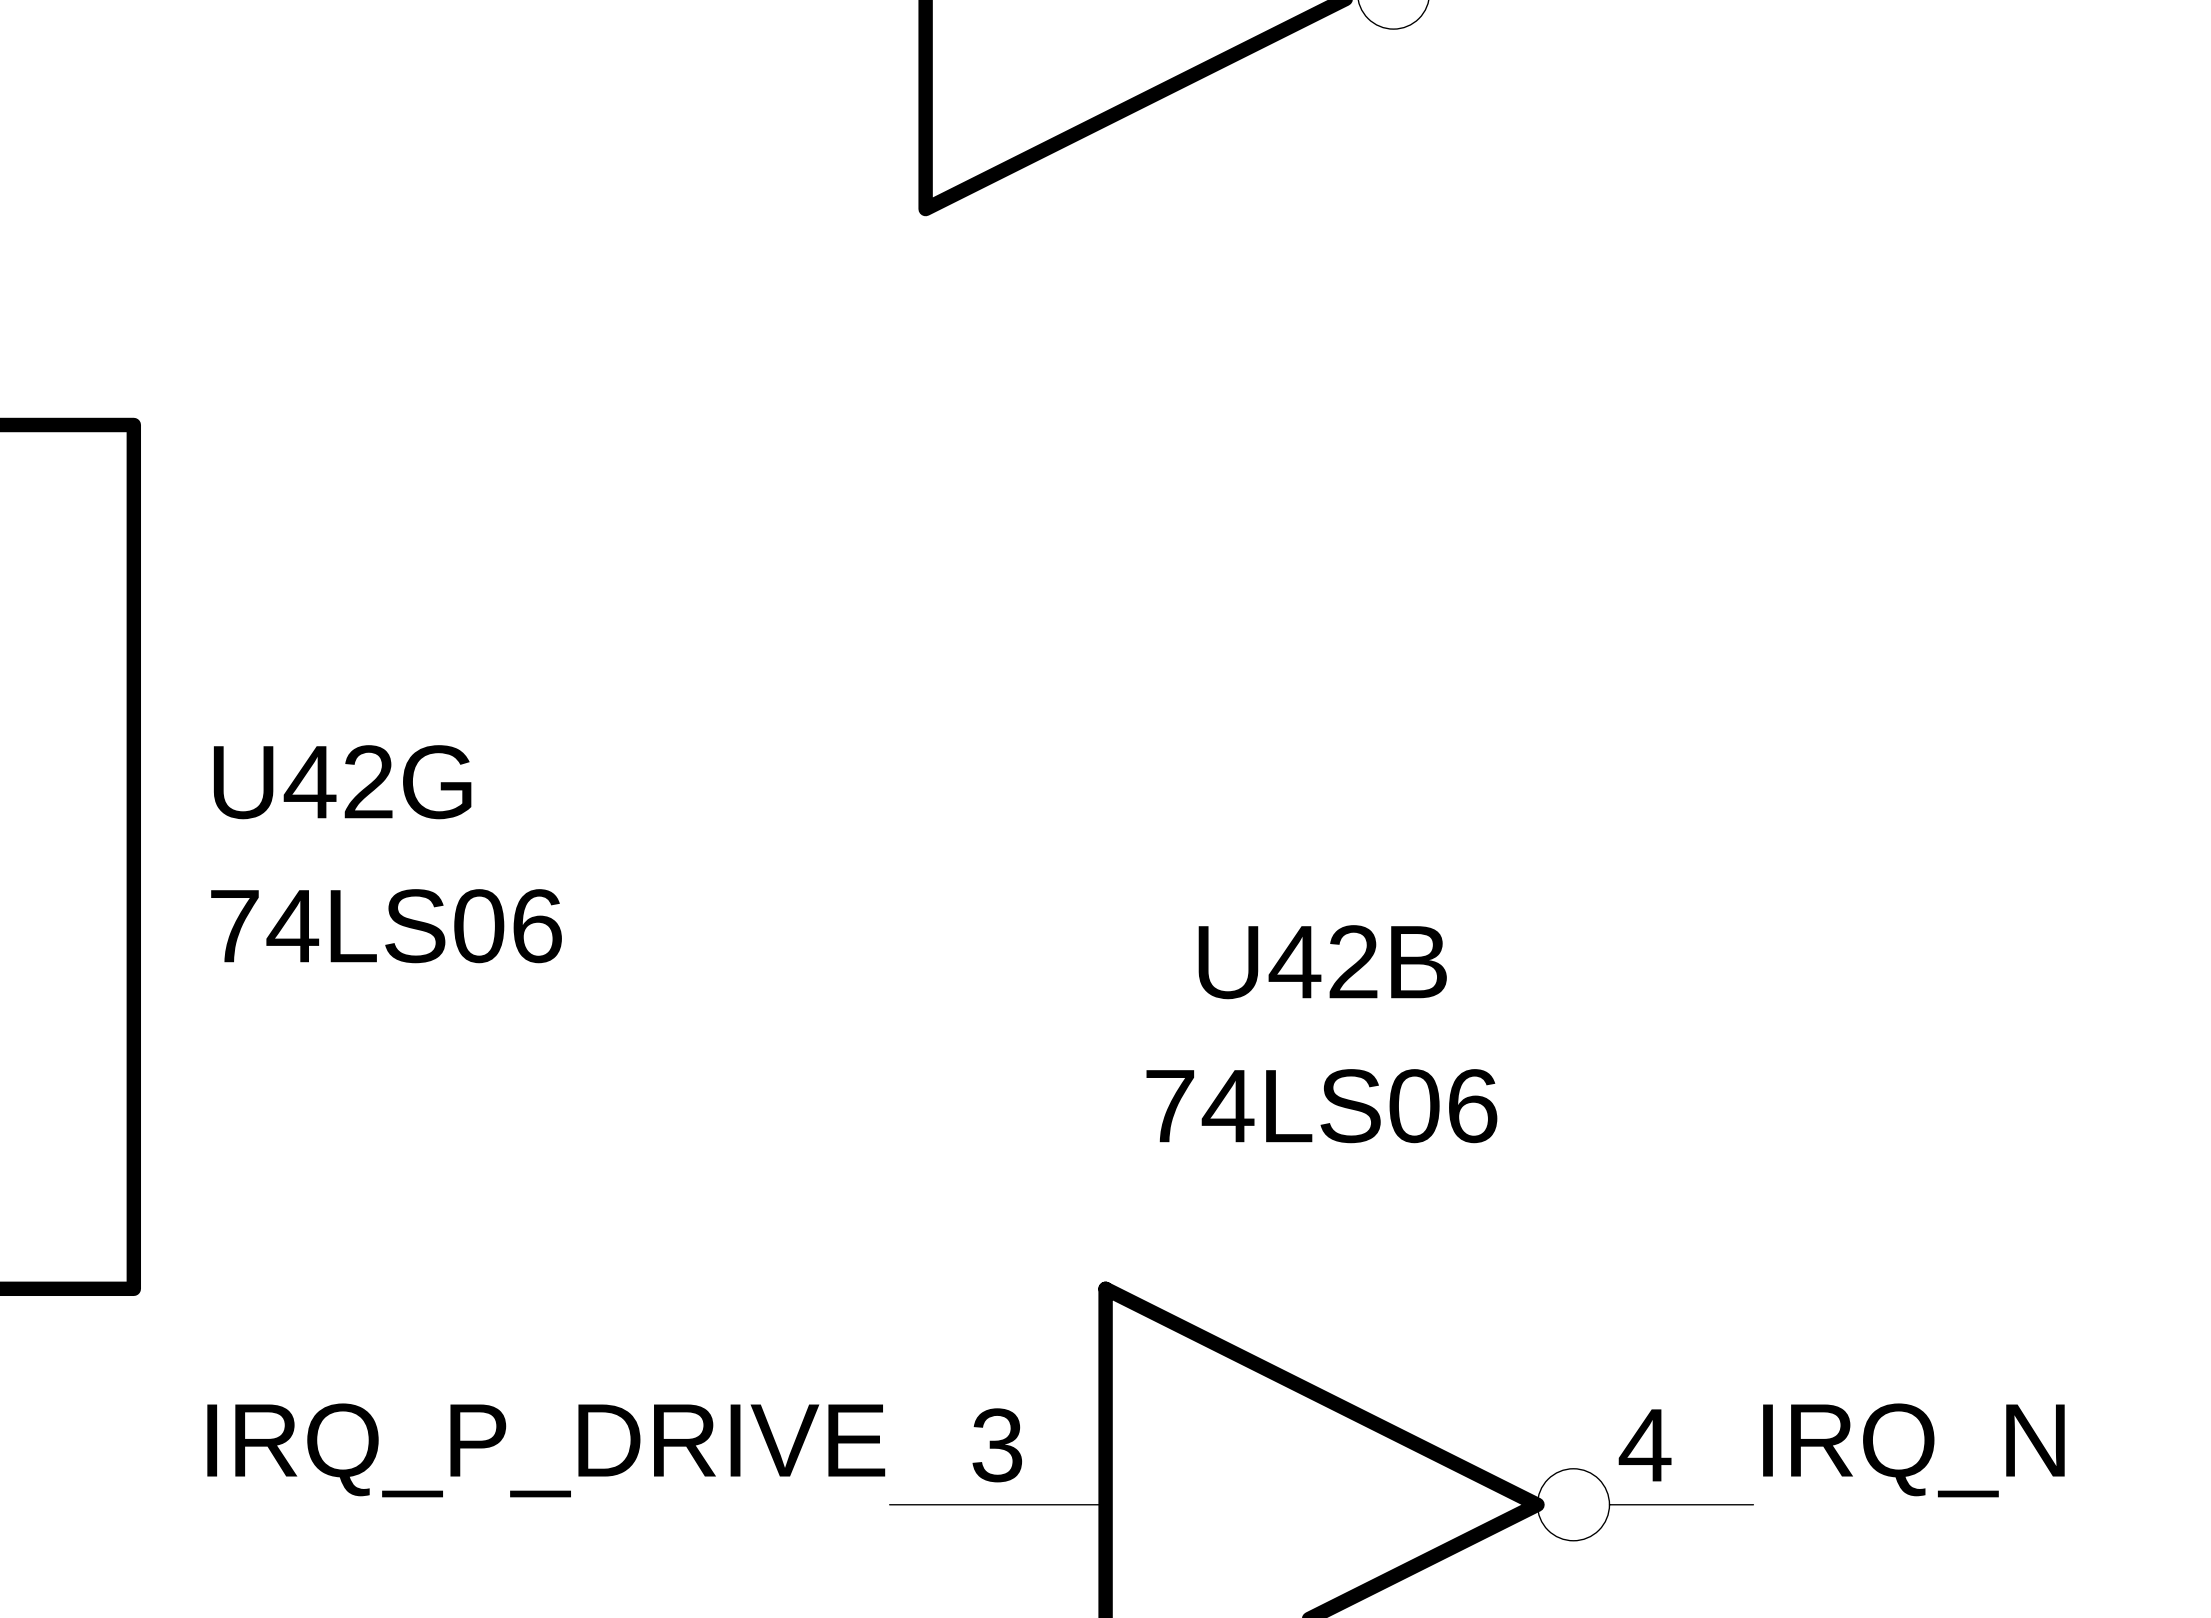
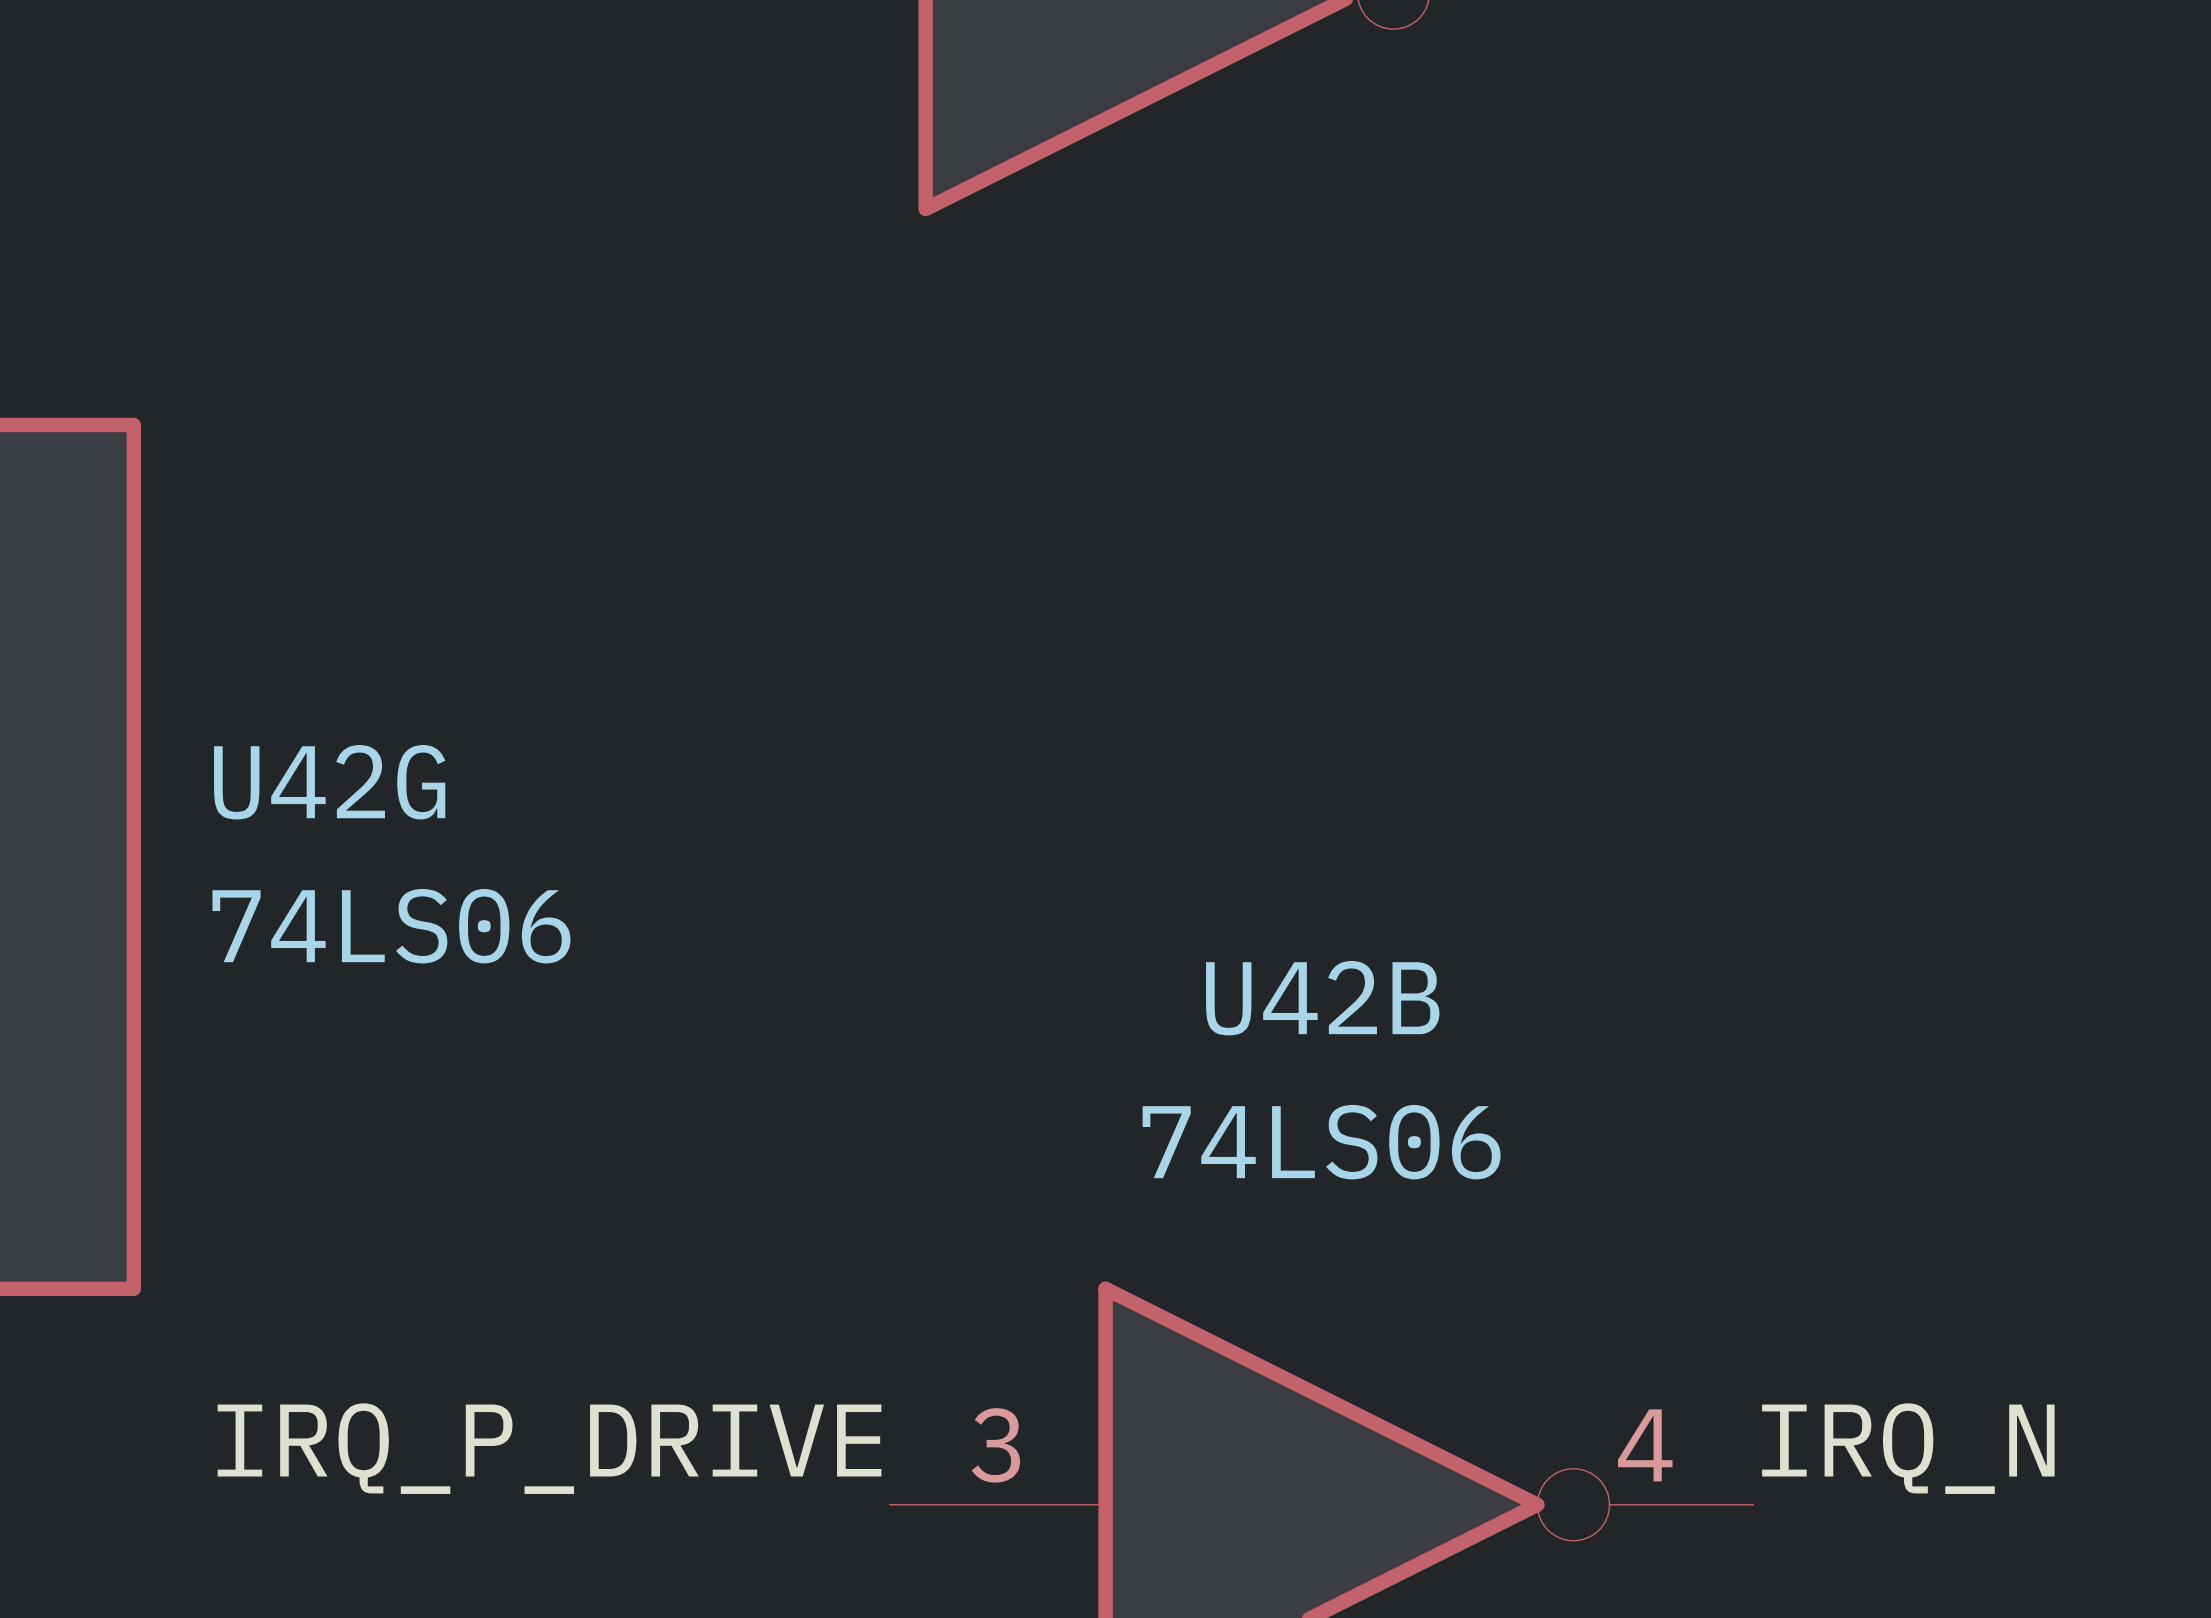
U42B name position: U42B (1322, 962) -> U42B (1322, 998)
U42B value position: 74LS06 (1321, 1106) -> 74LS06 (1321, 1142)

